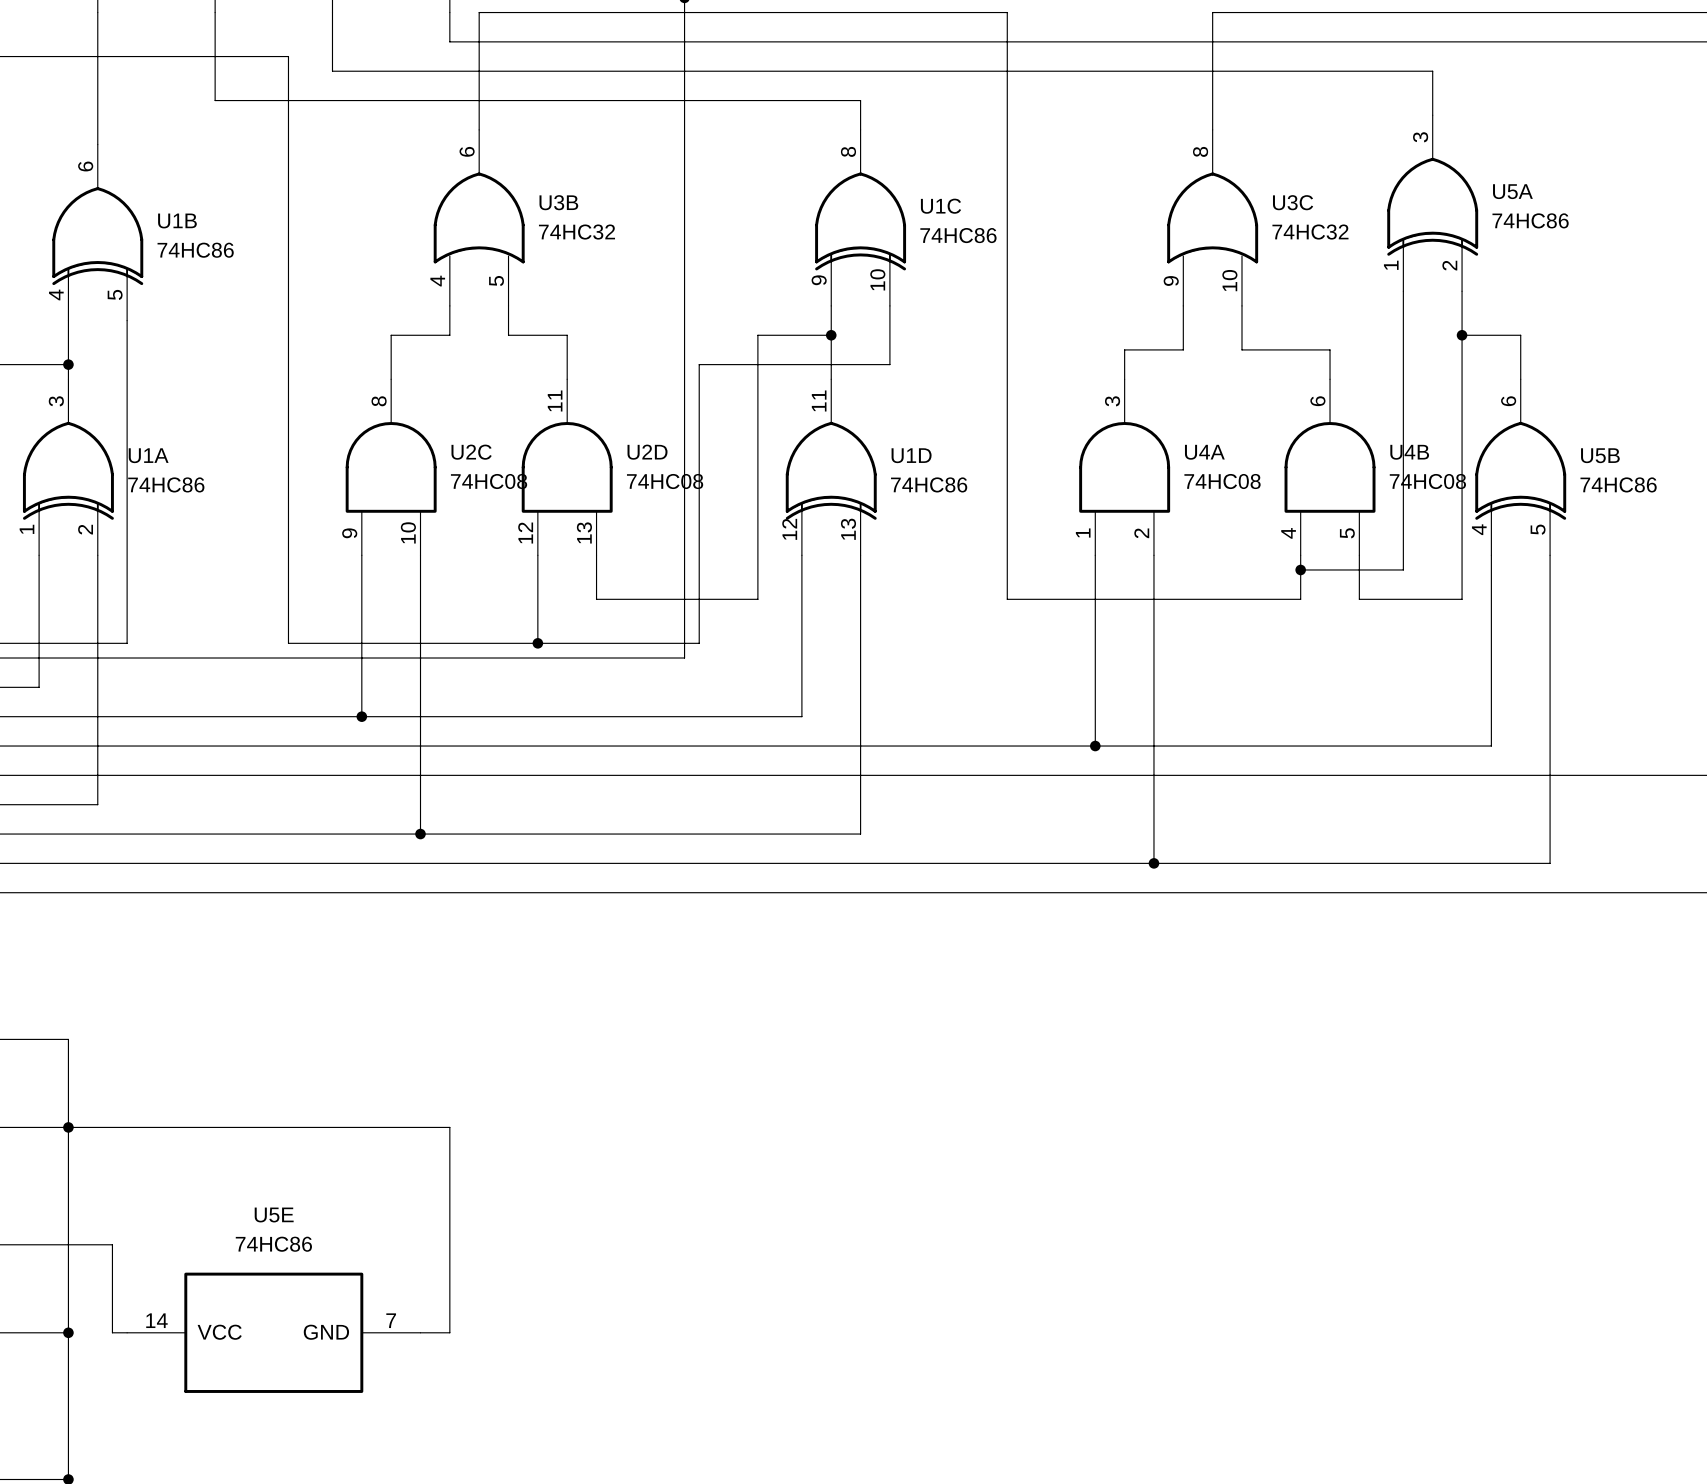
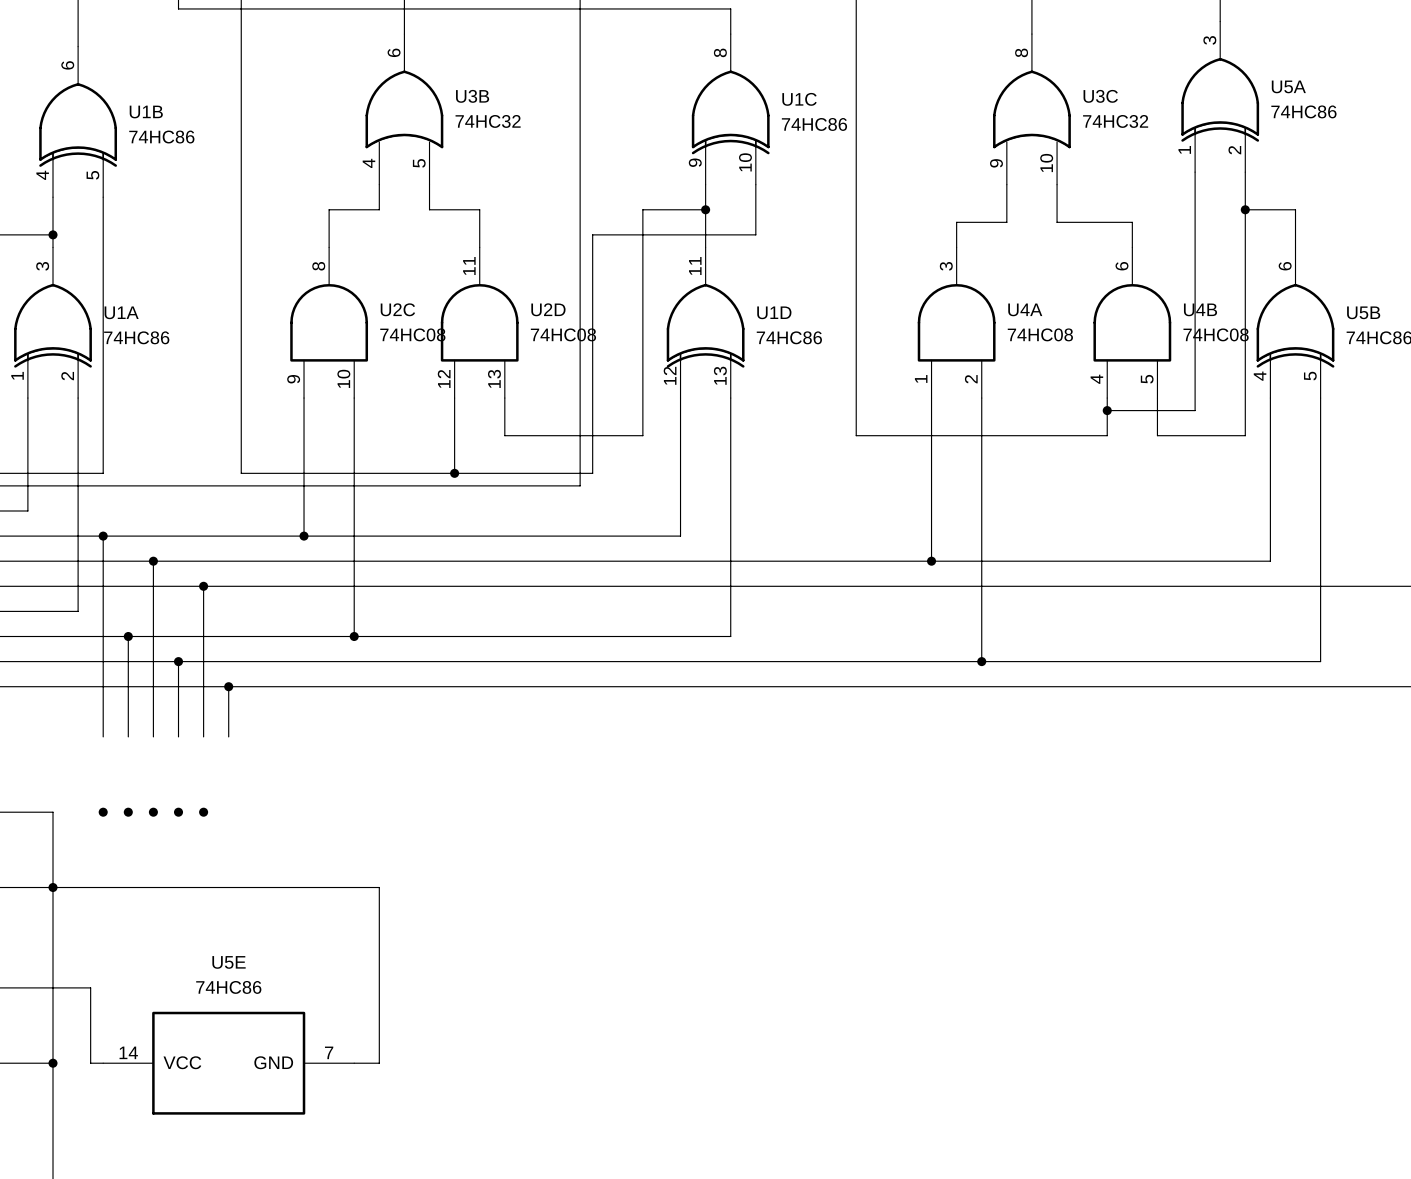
wire: none -> (103, 536) (103, 736)
junction: none -> (103, 536)
wire: none -> (153, 561) (153, 736)
junction: none -> (153, 561)
wire: none -> (203, 586) (203, 736)
junction: none -> (203, 586)
wire: none -> (128, 636) (128, 736)
junction: none -> (128, 636)
wire: none -> (178, 661) (178, 736)
junction: none -> (178, 661)
wire: none -> (228, 686) (228, 736)
junction: none -> (228, 686)
junction: none -> (103, 812)
junction: none -> (128, 812)
junction: none -> (153, 812)
junction: none -> (178, 812)
junction: none -> (203, 812)

